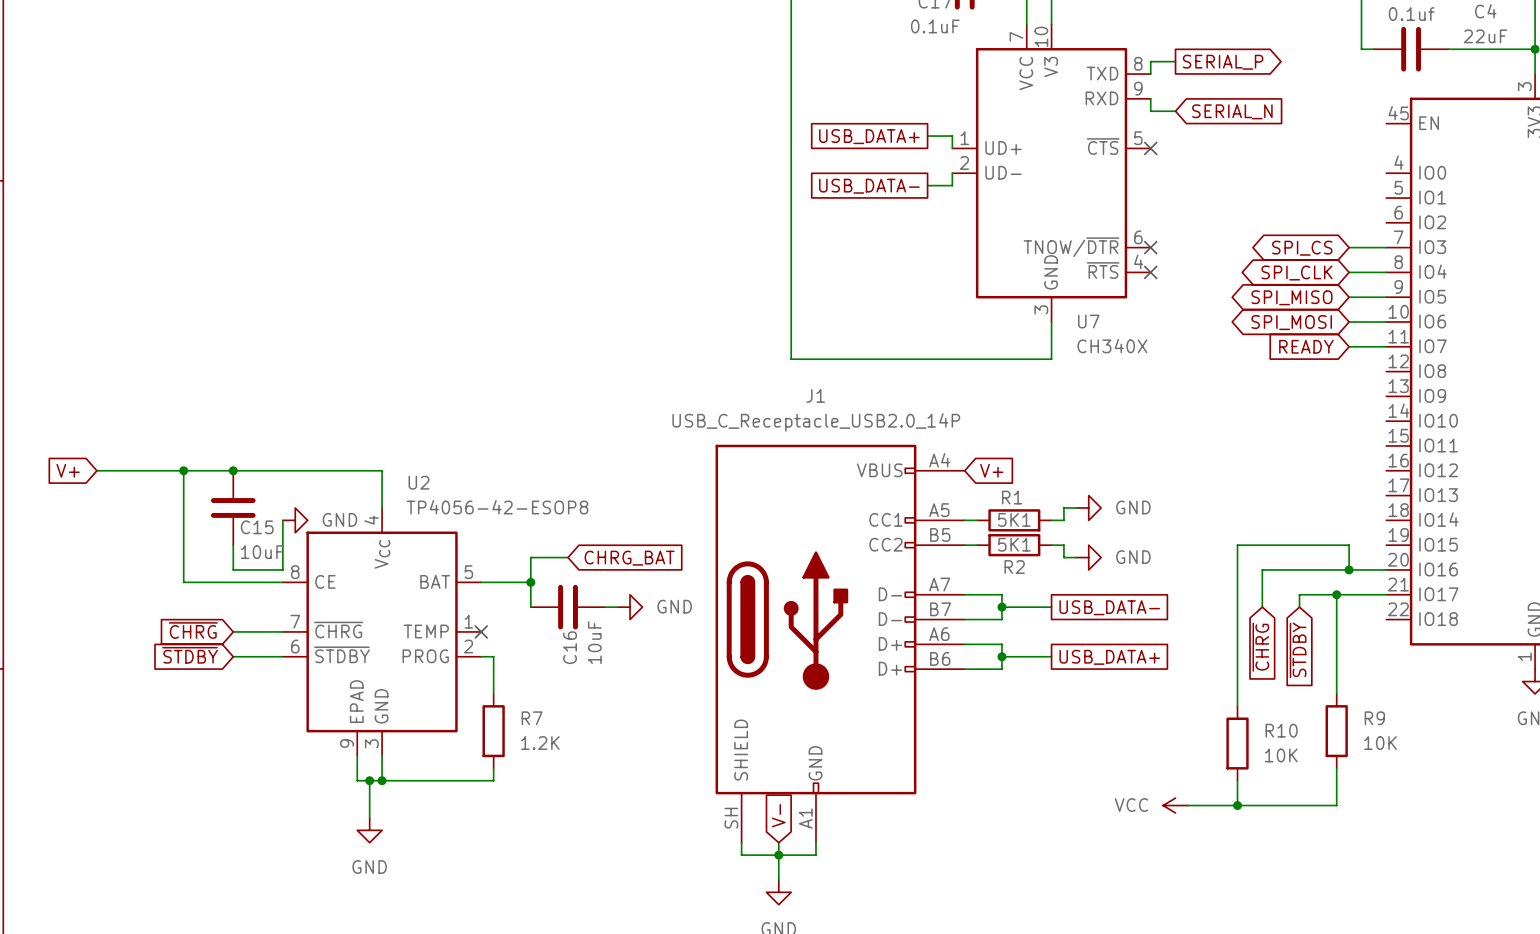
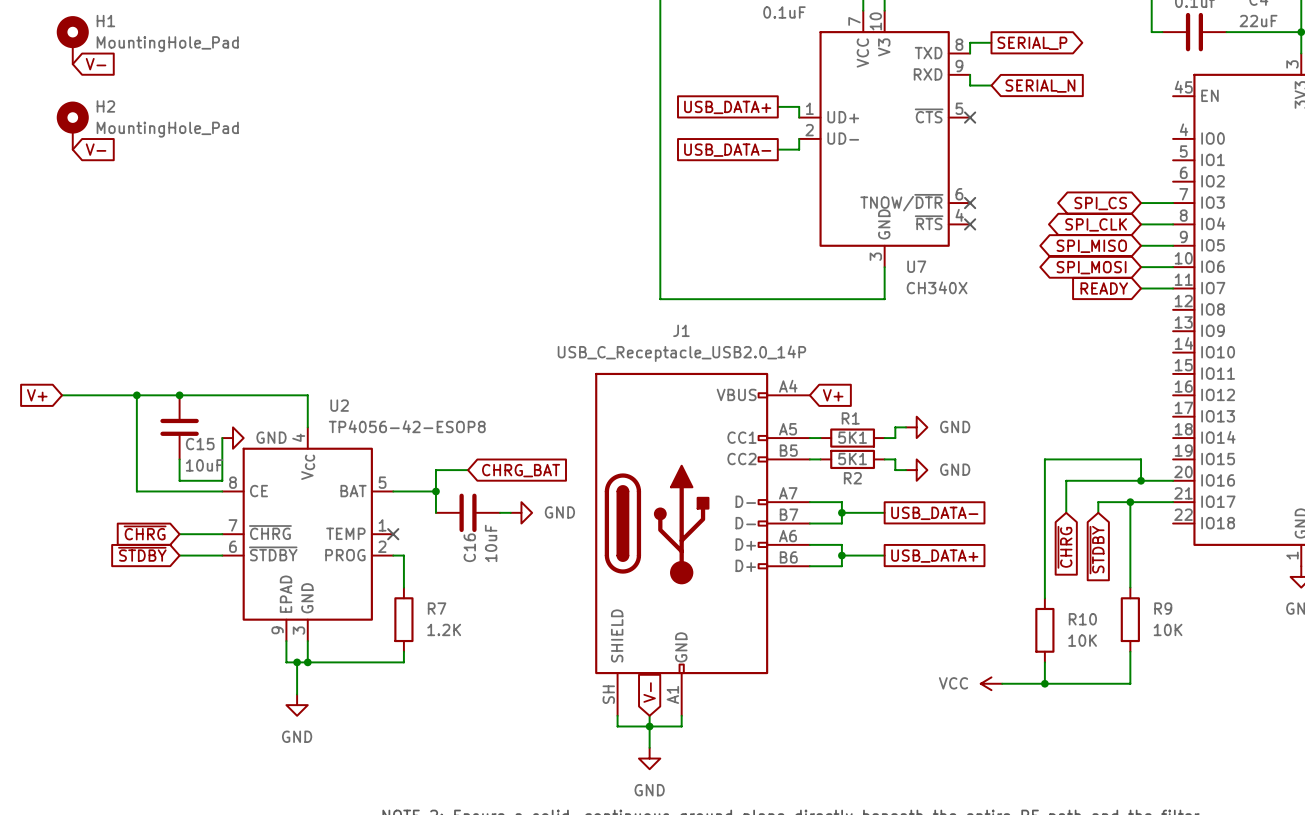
H1: none -> MountingHole_Pad (72, 40)
global label: none -> V- (96, 64)
H2: none -> MountingHole_Pad (72, 125)
global label: none -> V- (96, 149)

